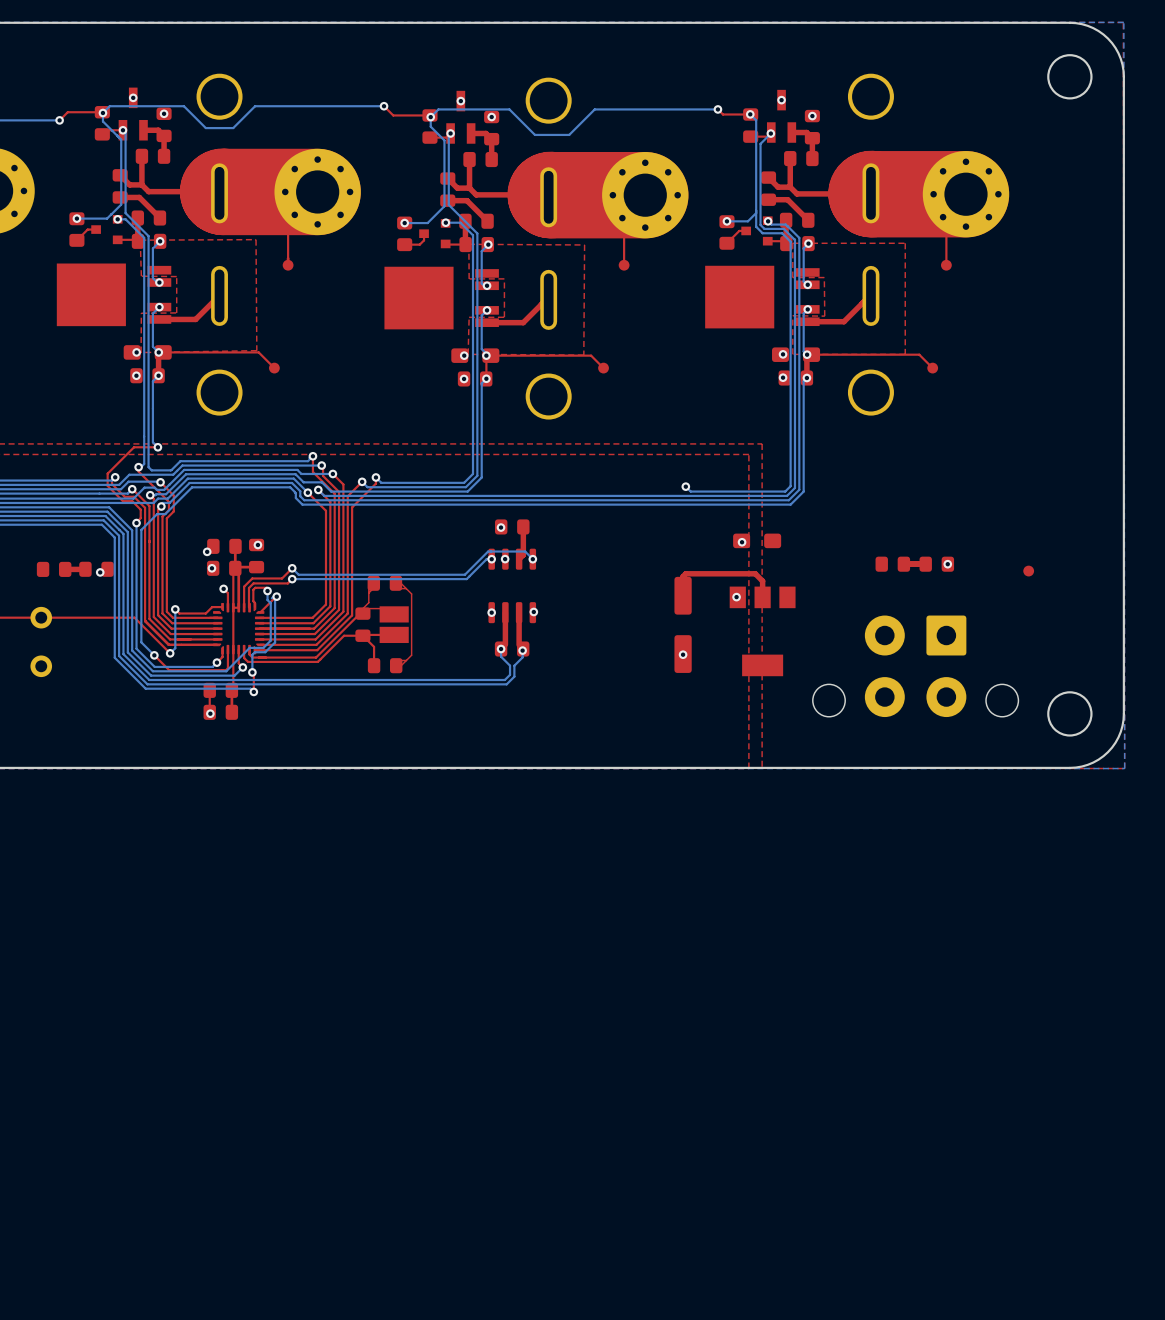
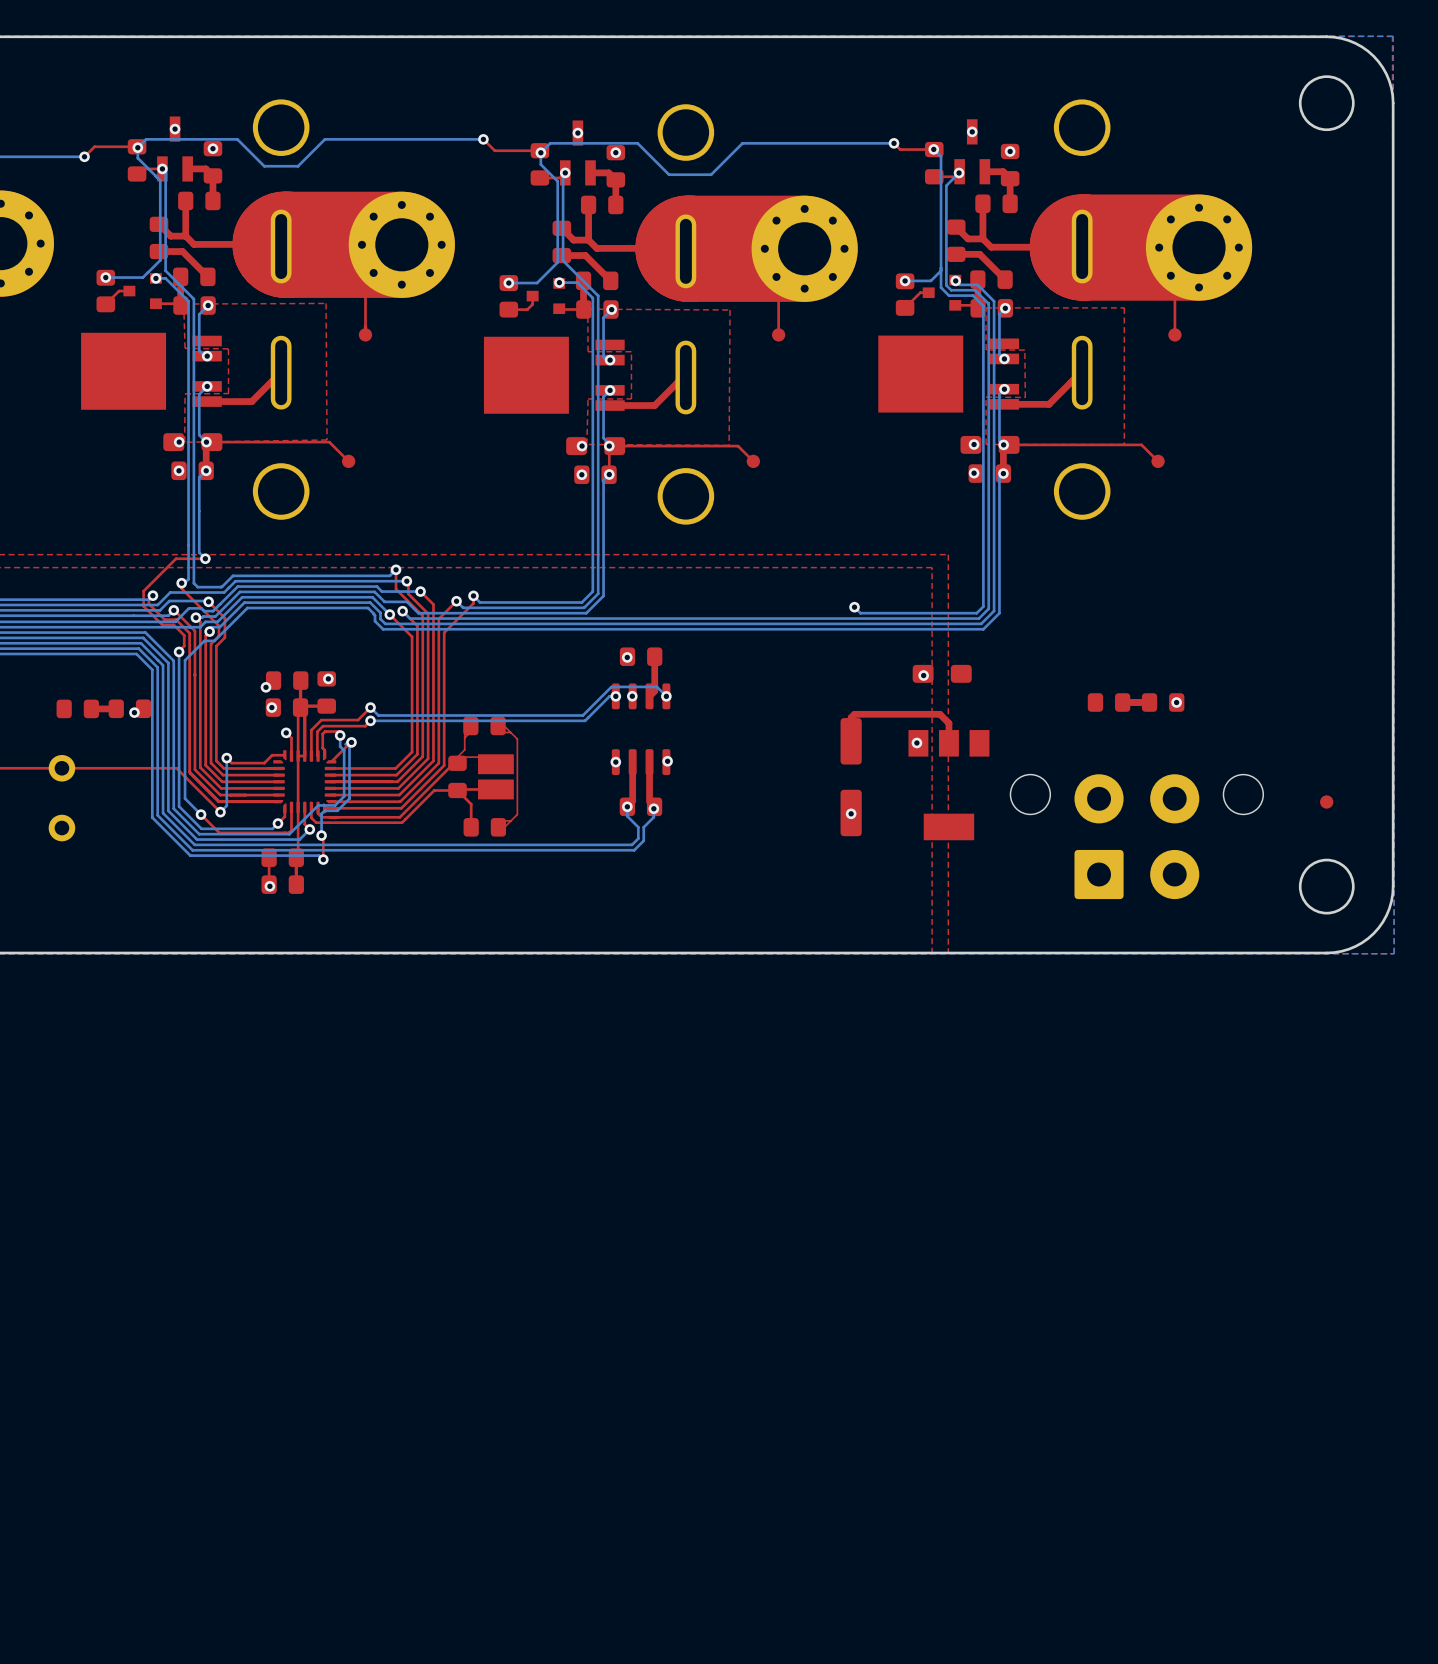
part position: (1028, 571) -> (1326, 802)
part rotation: 0° (915, 666) -> 180° (1136, 836)

